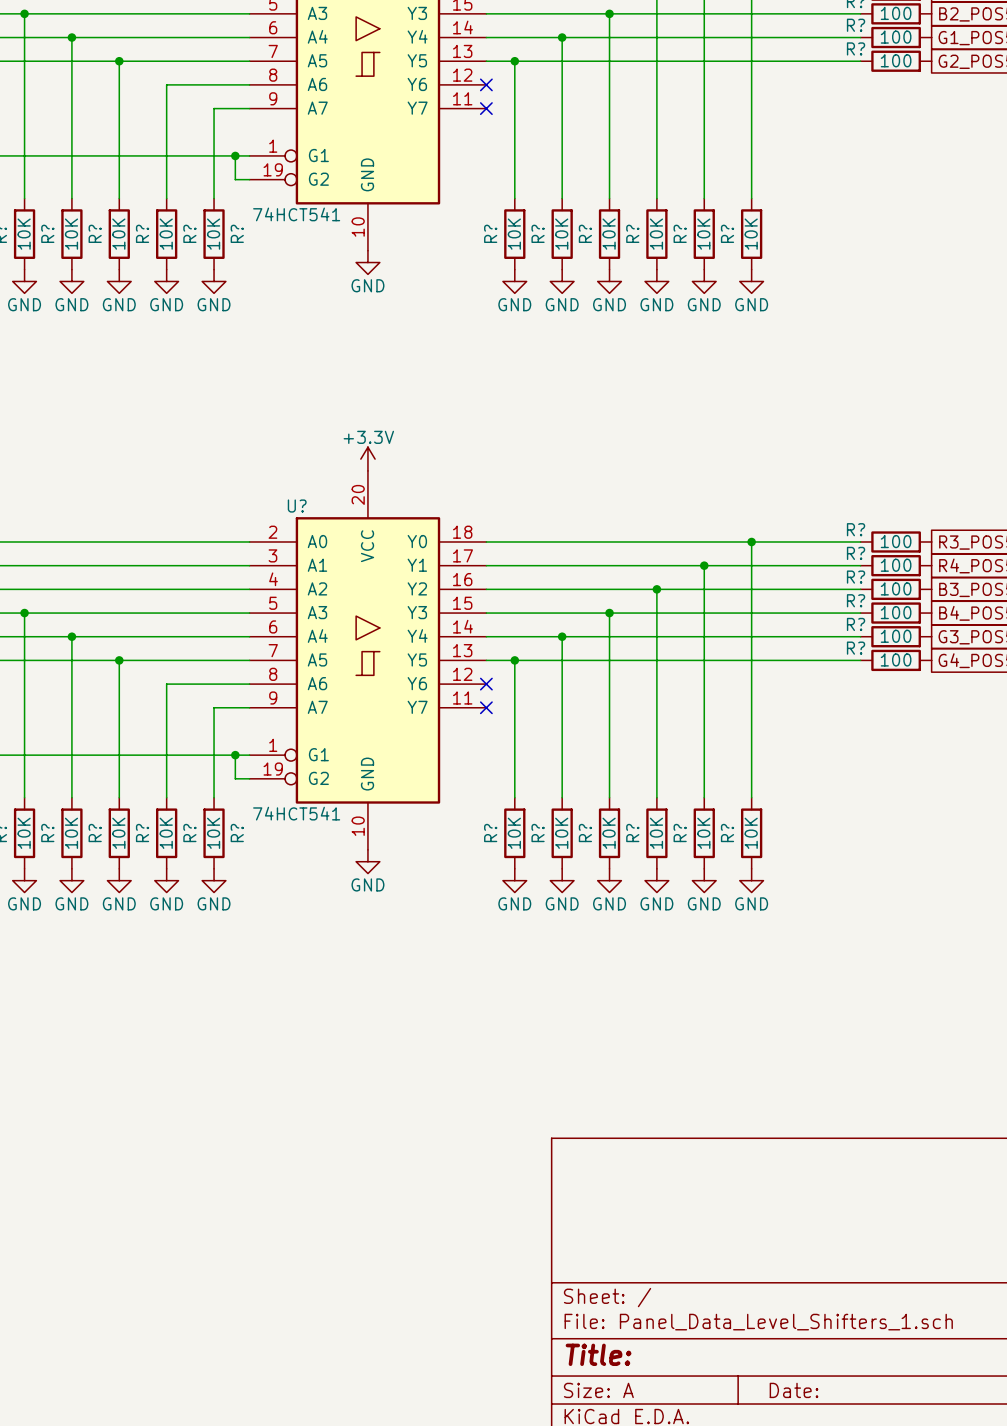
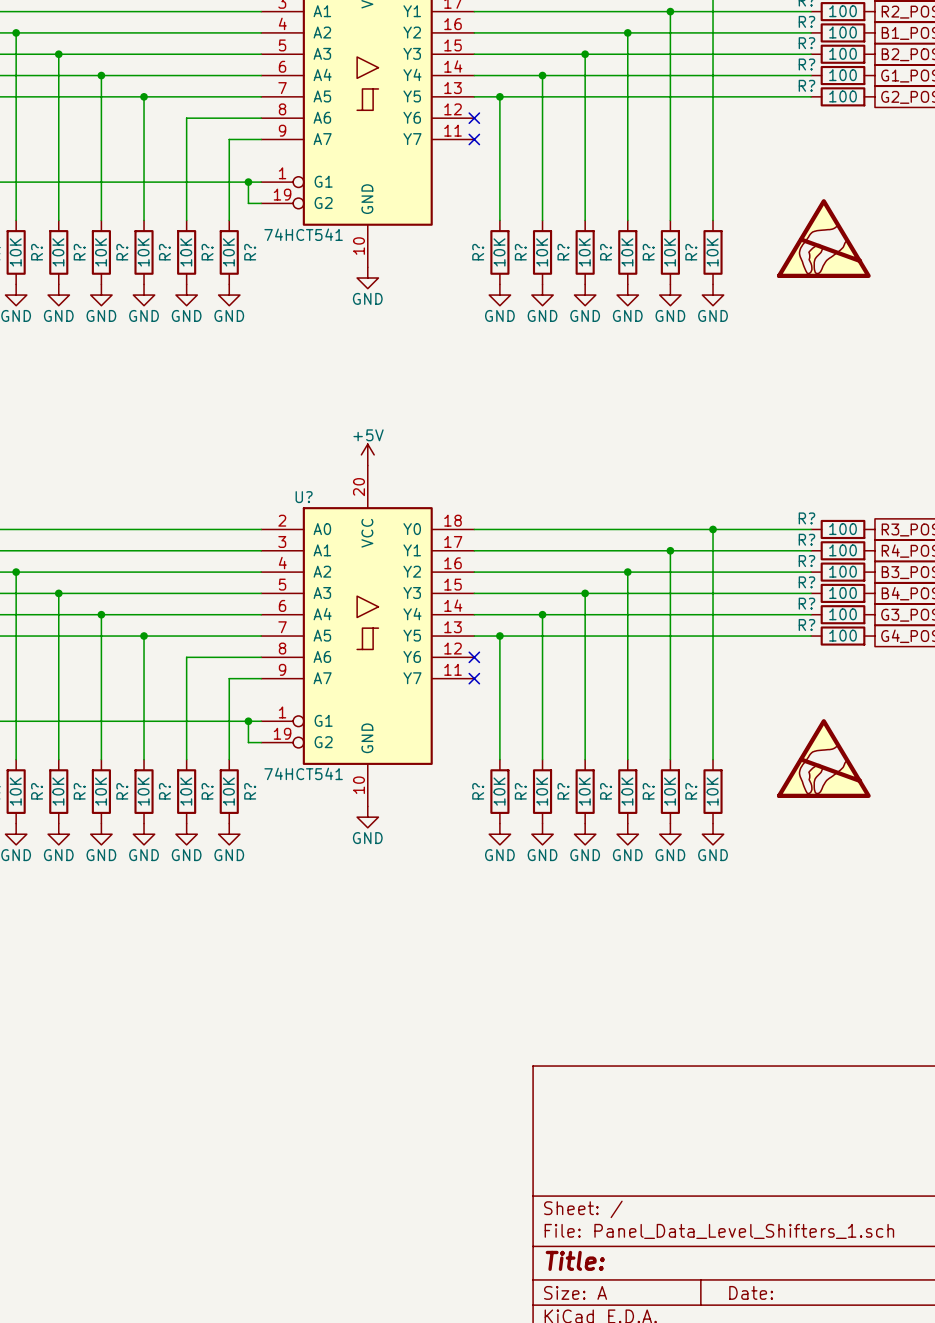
power symbol: none -> (823, 238)
power symbol: +3.3V (367, 459) -> +5V (367, 454)
power symbol: none -> (823, 758)

